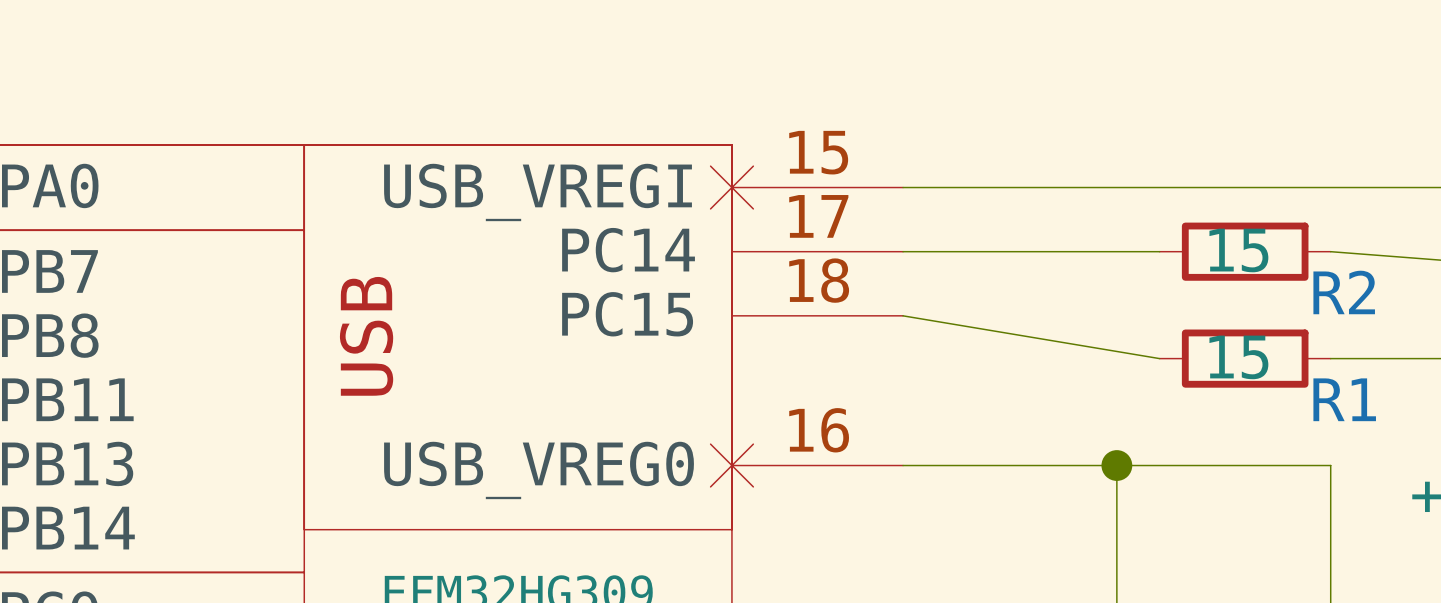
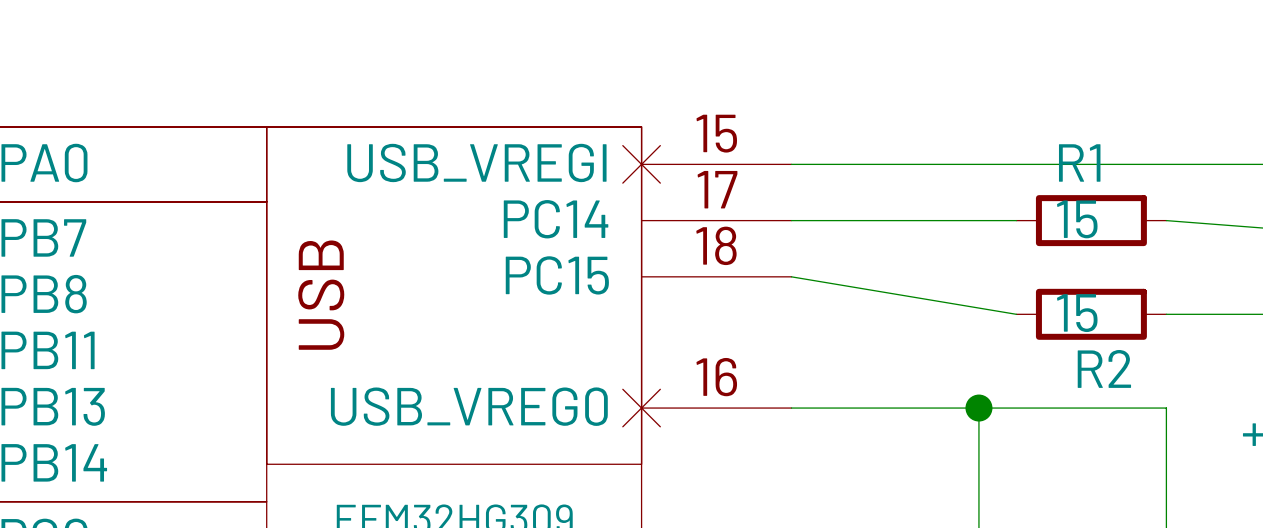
R2 name: R2 (1344, 292) -> R1 (1079, 162)
R1 name: R1 (1344, 399) -> R2 (1104, 368)

